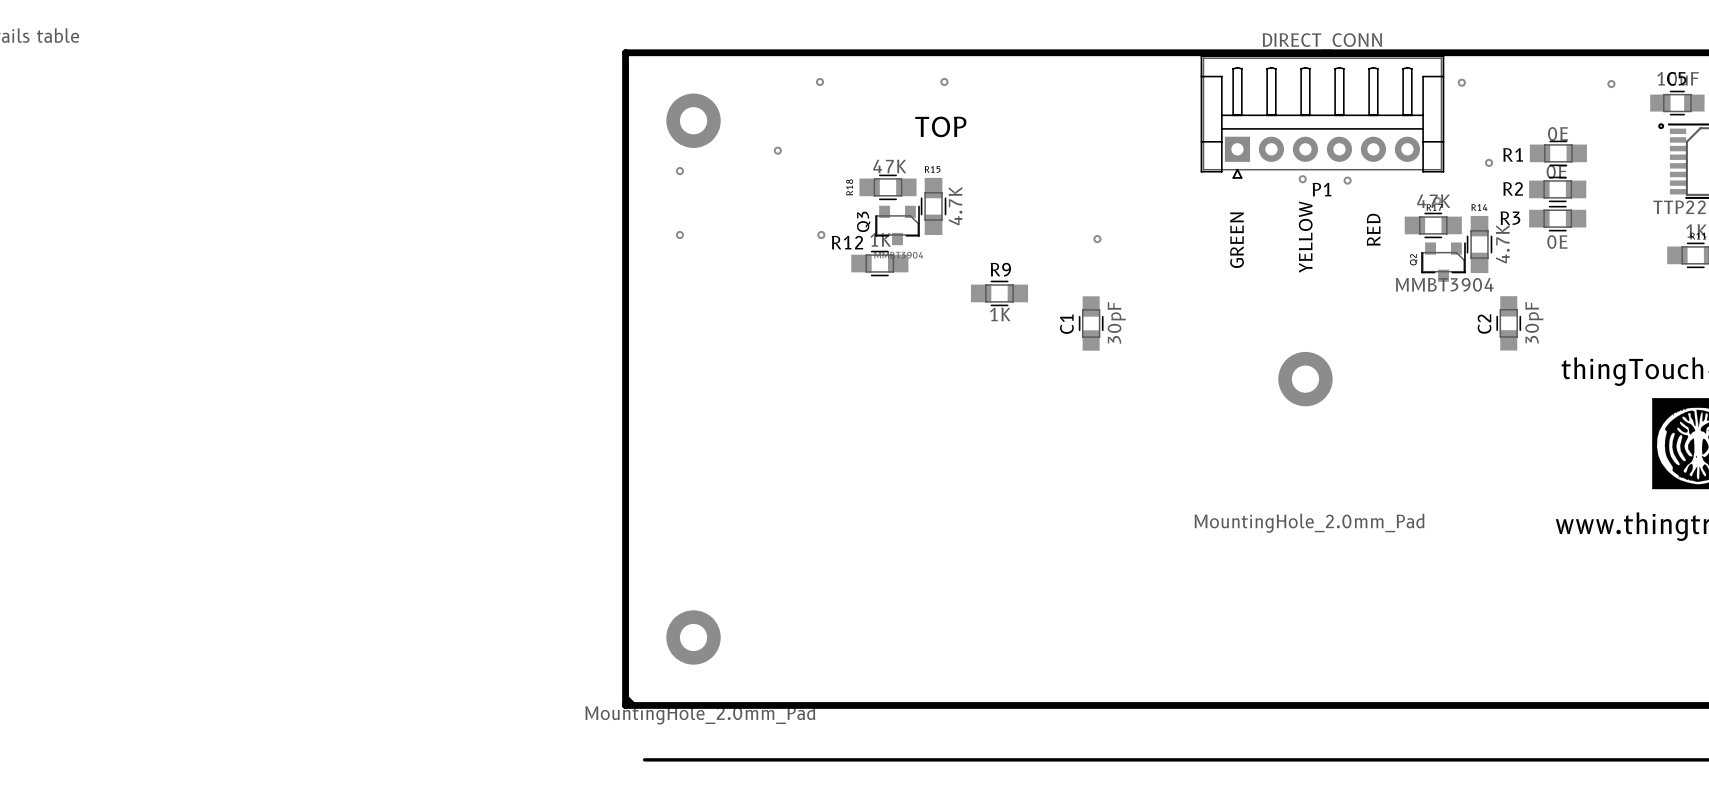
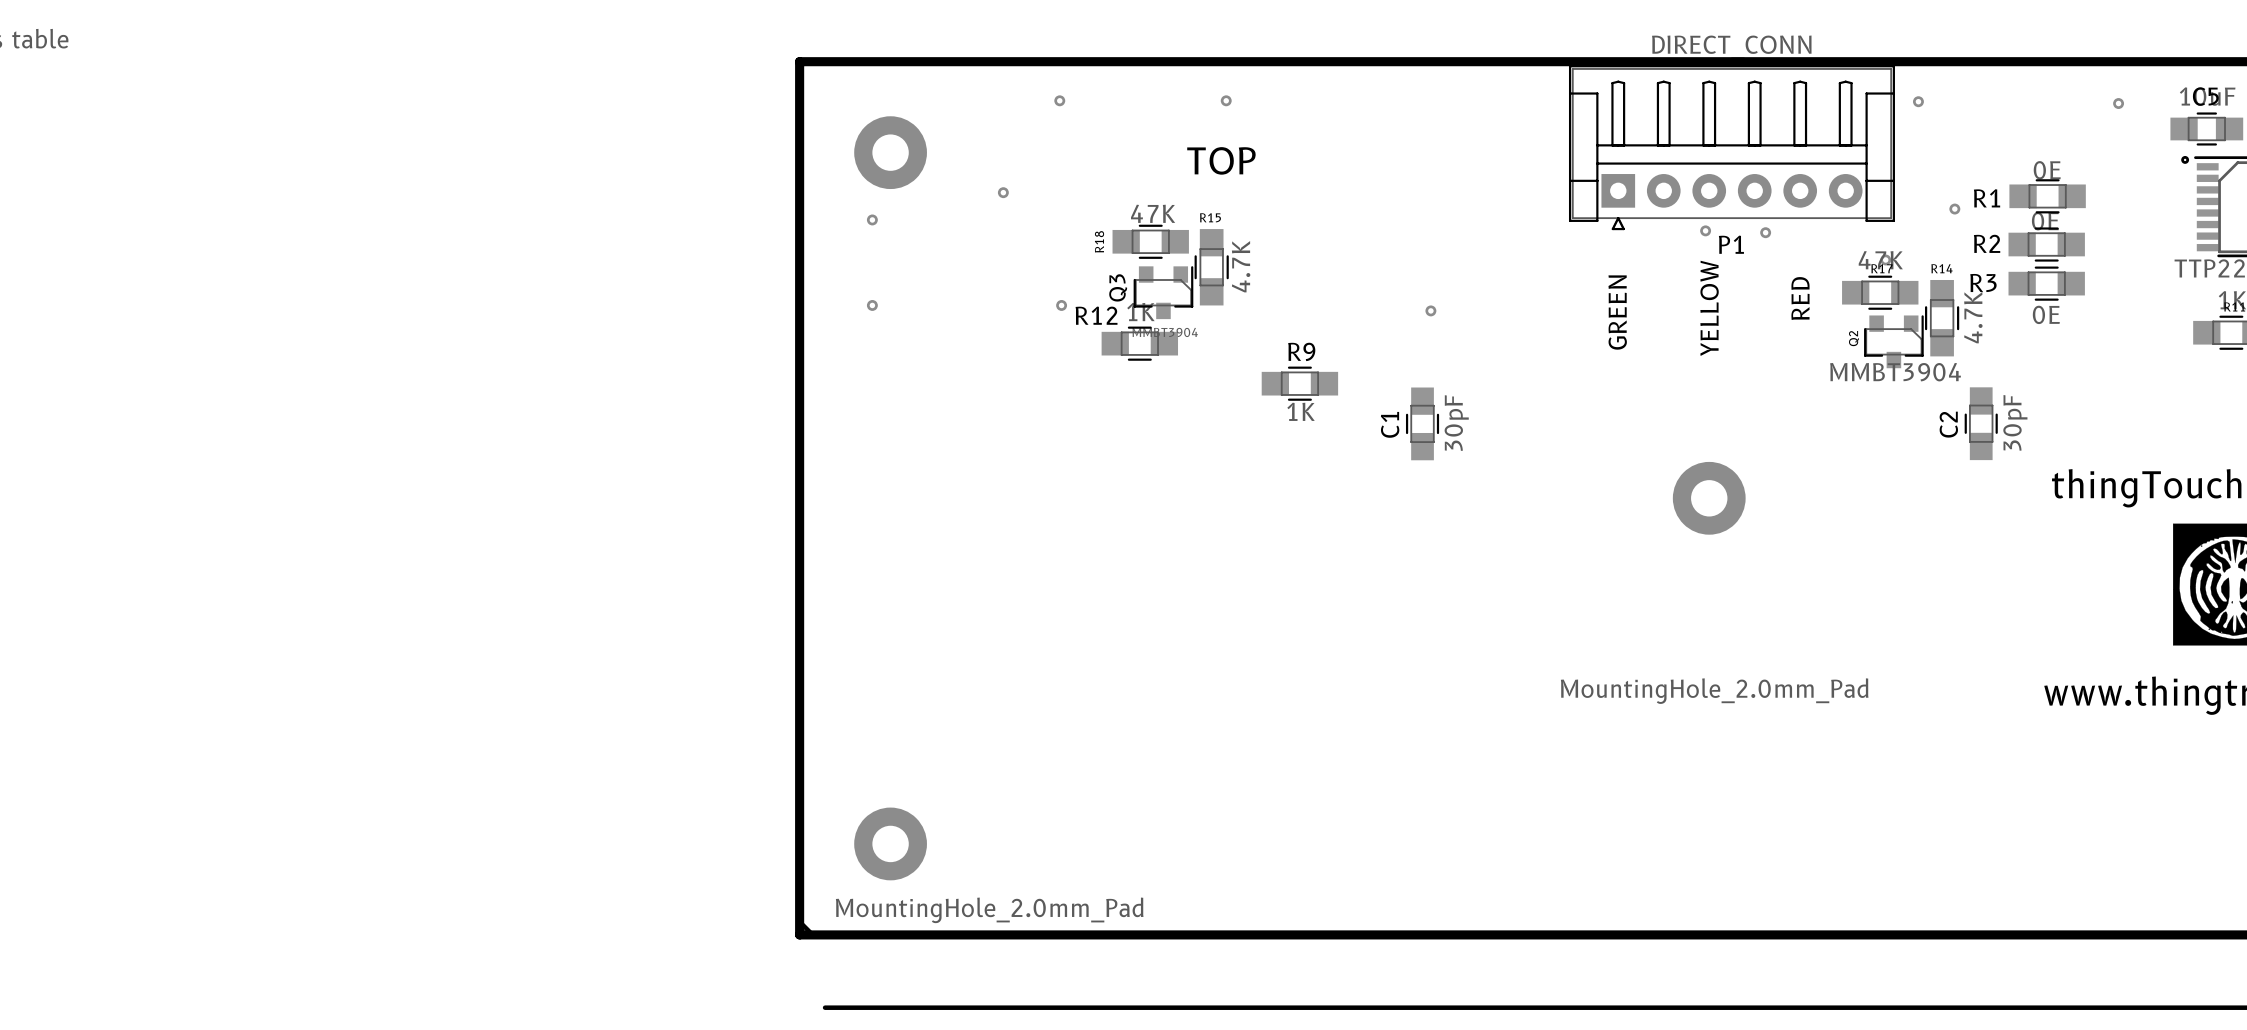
part value position: MountingHole_2.0mm_Pad (700, 714) -> MountingHole_2.0mm_Pad (989, 910)

